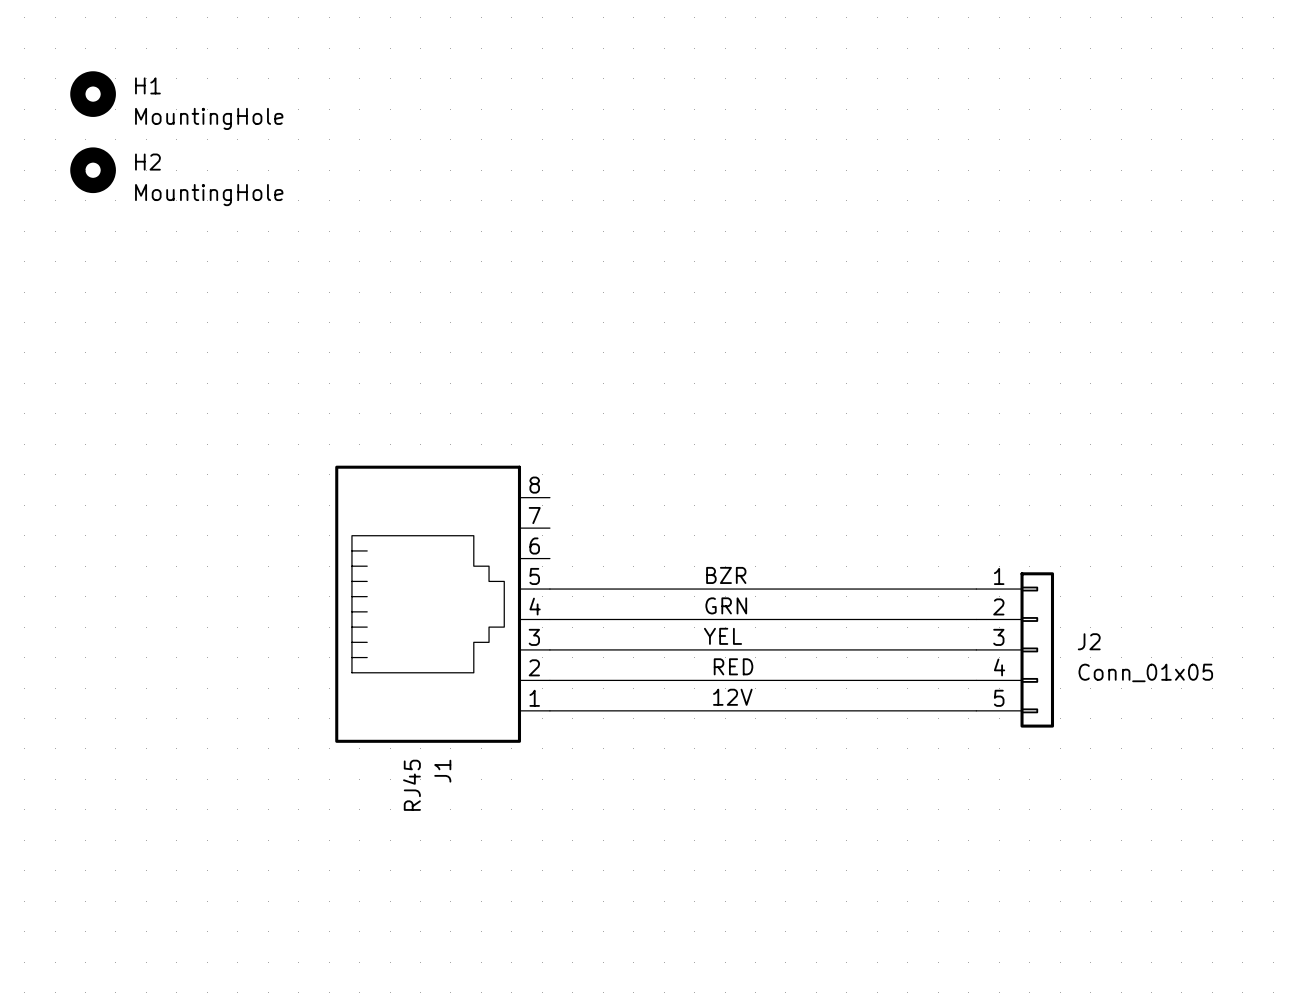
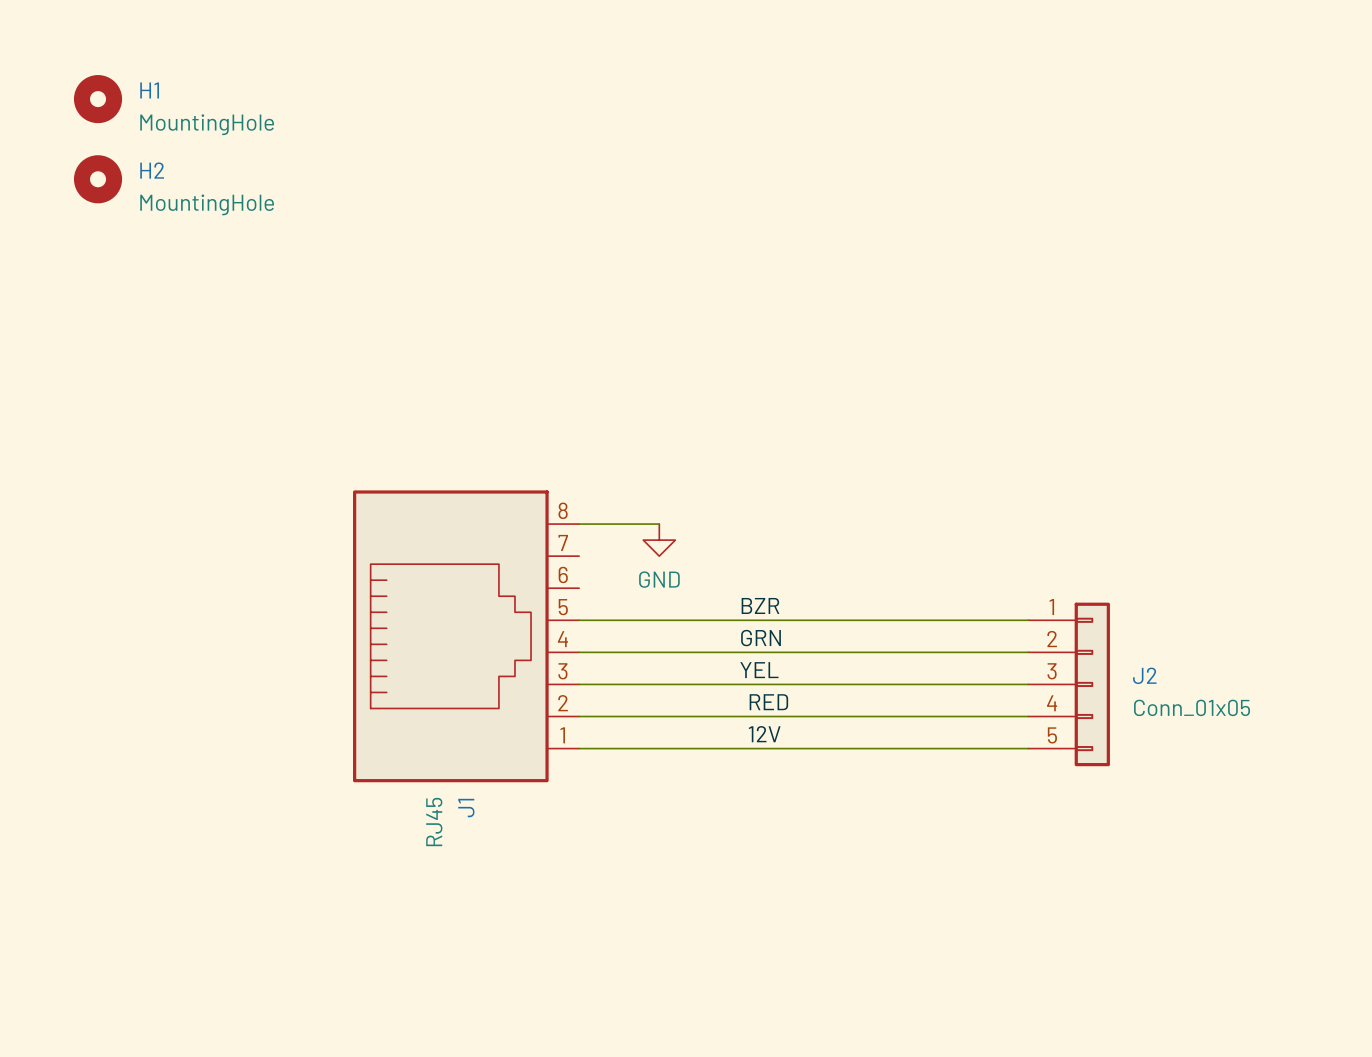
wire: none -> (579, 524) (659, 524)
power symbol: none -> GND (659, 540)

